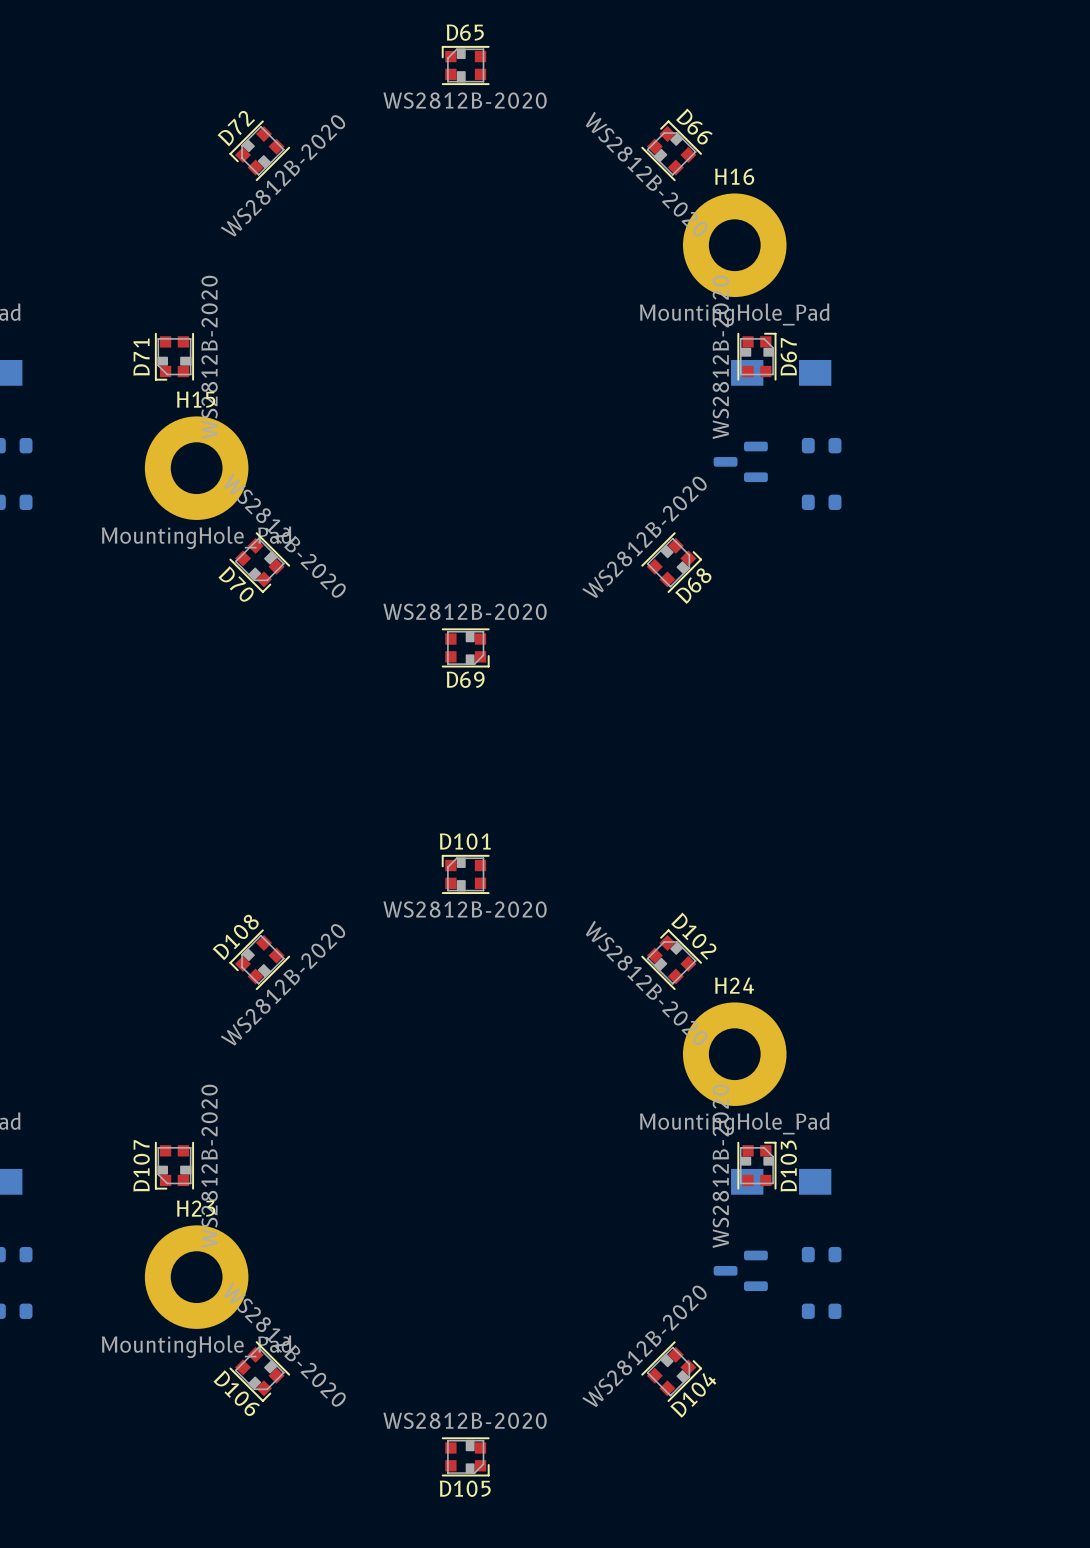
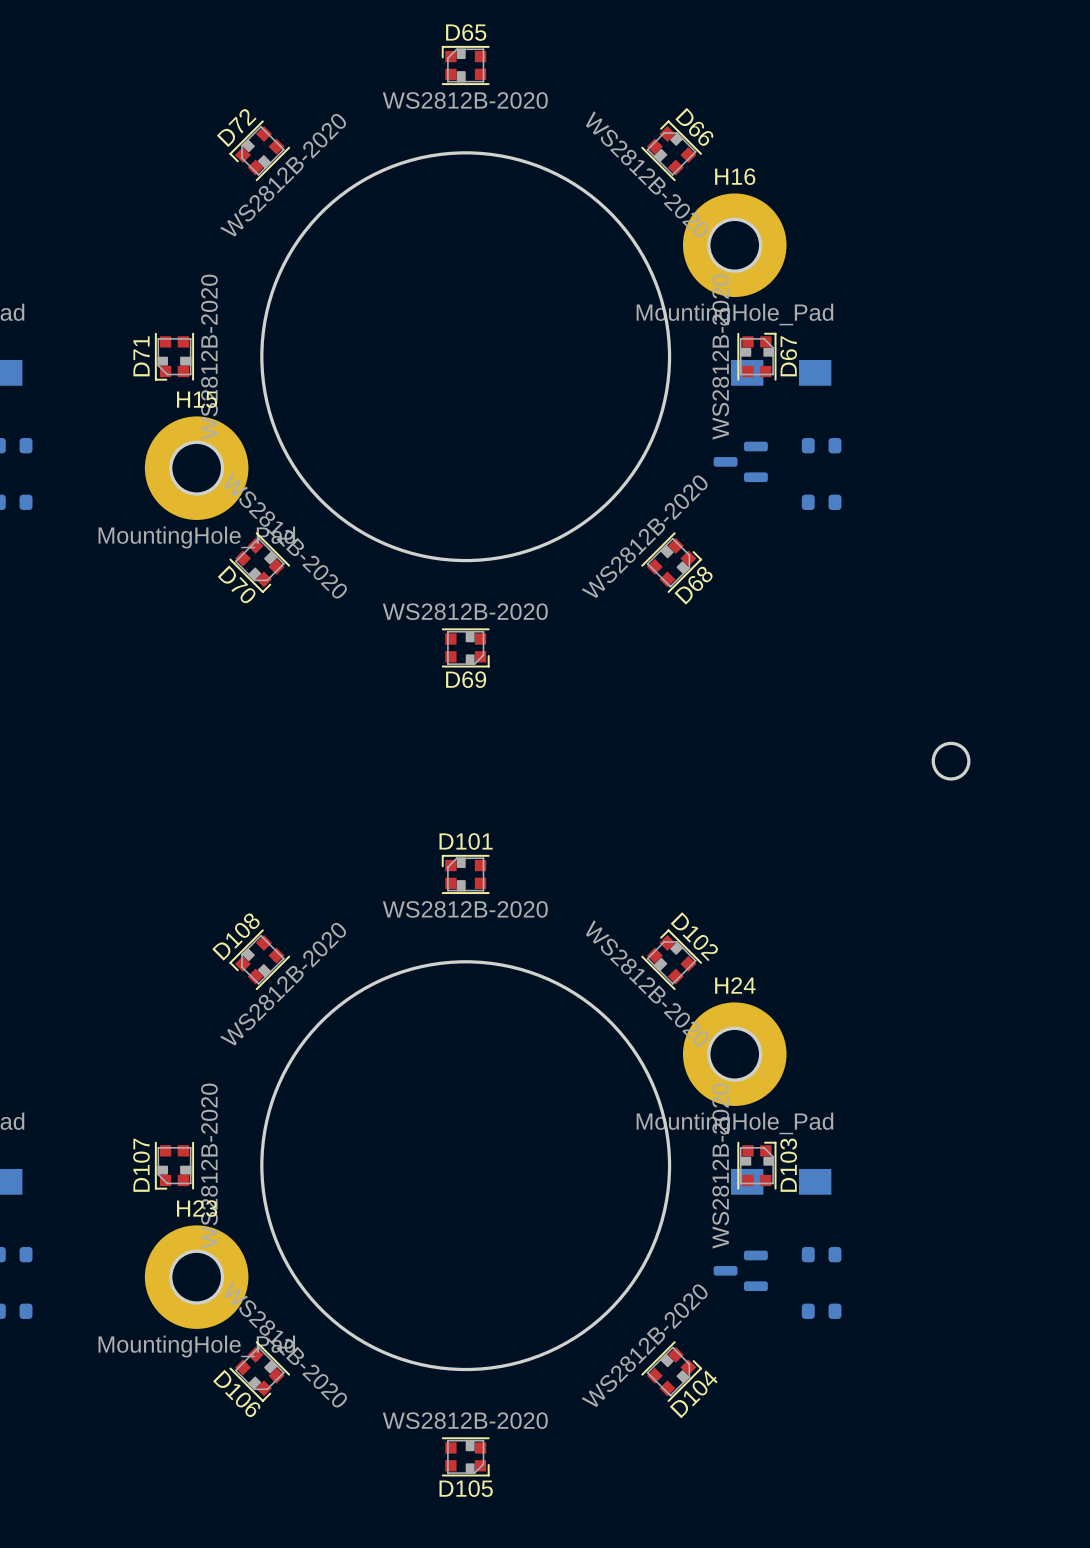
round board edge: none -> [260, 151, 672, 563]
round board edge: none -> [707, 217, 763, 273]
round board edge: none -> [169, 440, 225, 496]
round board edge: none -> [931, 741, 971, 781]
round board edge: none -> [260, 960, 672, 1372]
round board edge: none -> [707, 1026, 763, 1082]
round board edge: none -> [169, 1249, 225, 1305]

